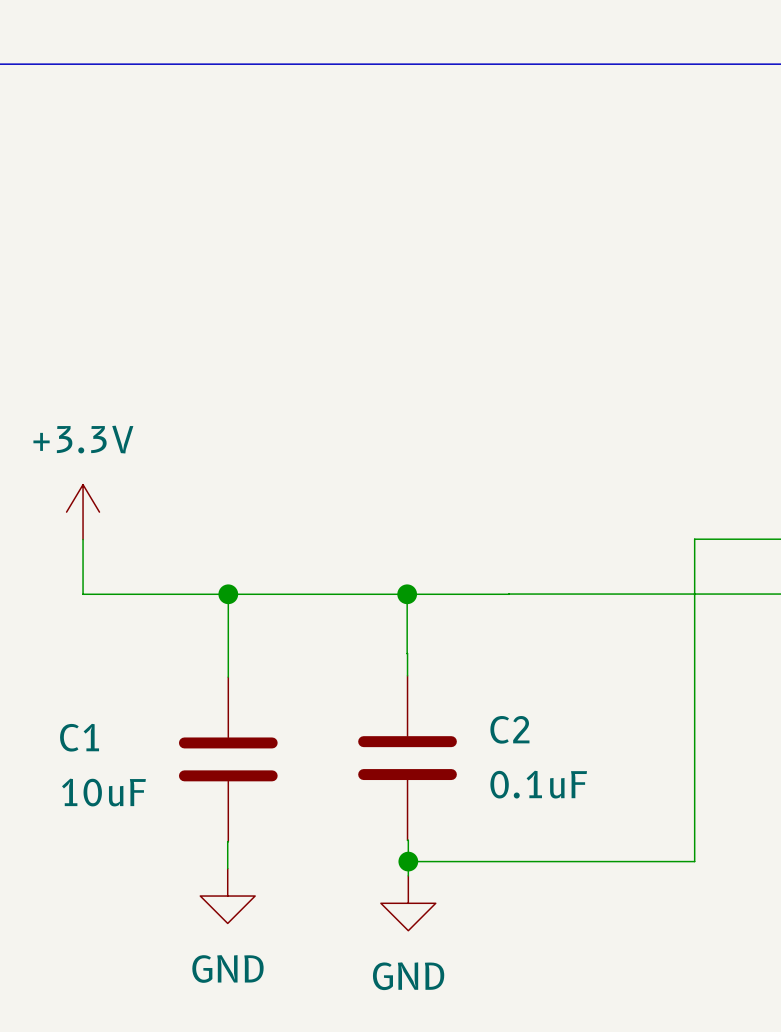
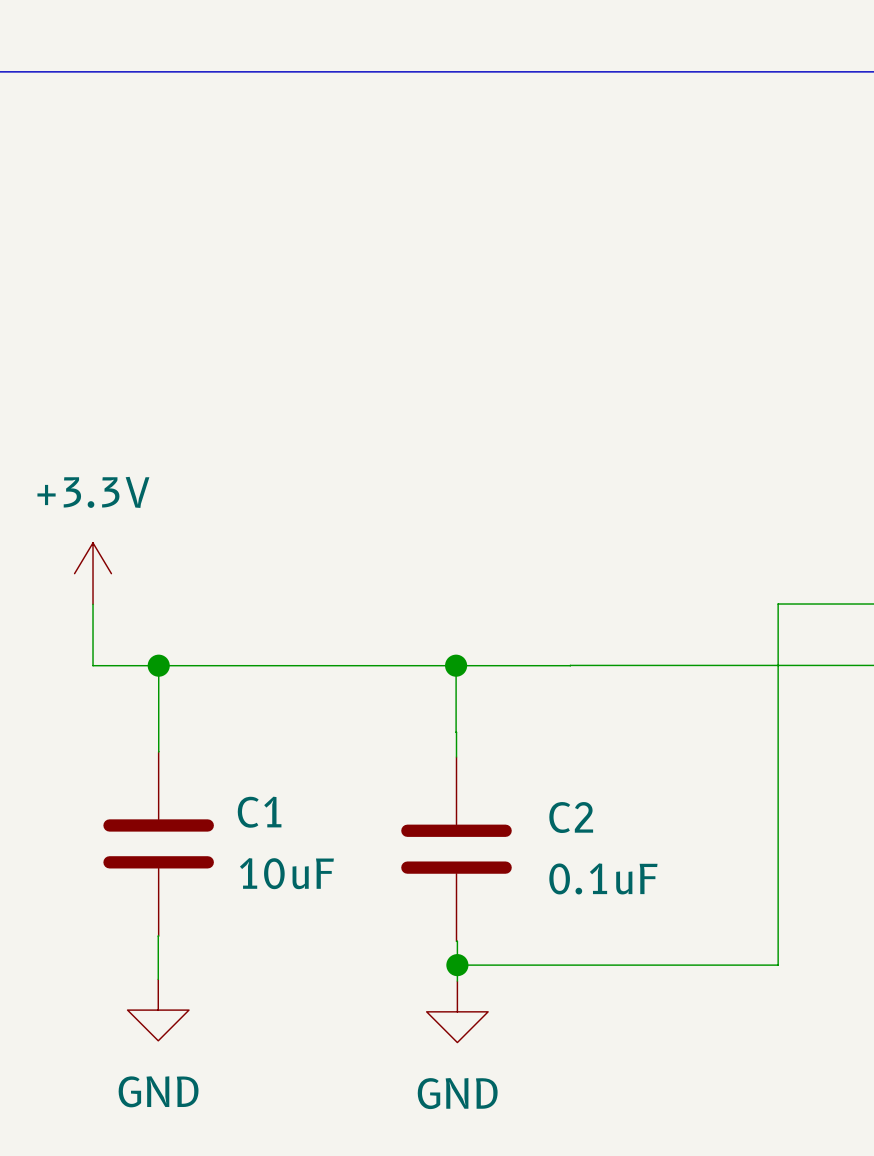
wire: none -> (158, 665) (158, 751)
wire: (228, 594) (228, 677) -> none
junction position: (228, 594) -> (158, 665)
C1 name position: C1 (79, 737) -> C1 (259, 812)
C1 position: (228, 759) -> (158, 843)
C1 value position: 10uF (103, 792) -> 10uF (286, 873)
wire: none -> (158, 936) (158, 979)
wire: (228, 841) (227, 868) -> none
power symbol position: GND (227, 896) -> GND (158, 1010)

